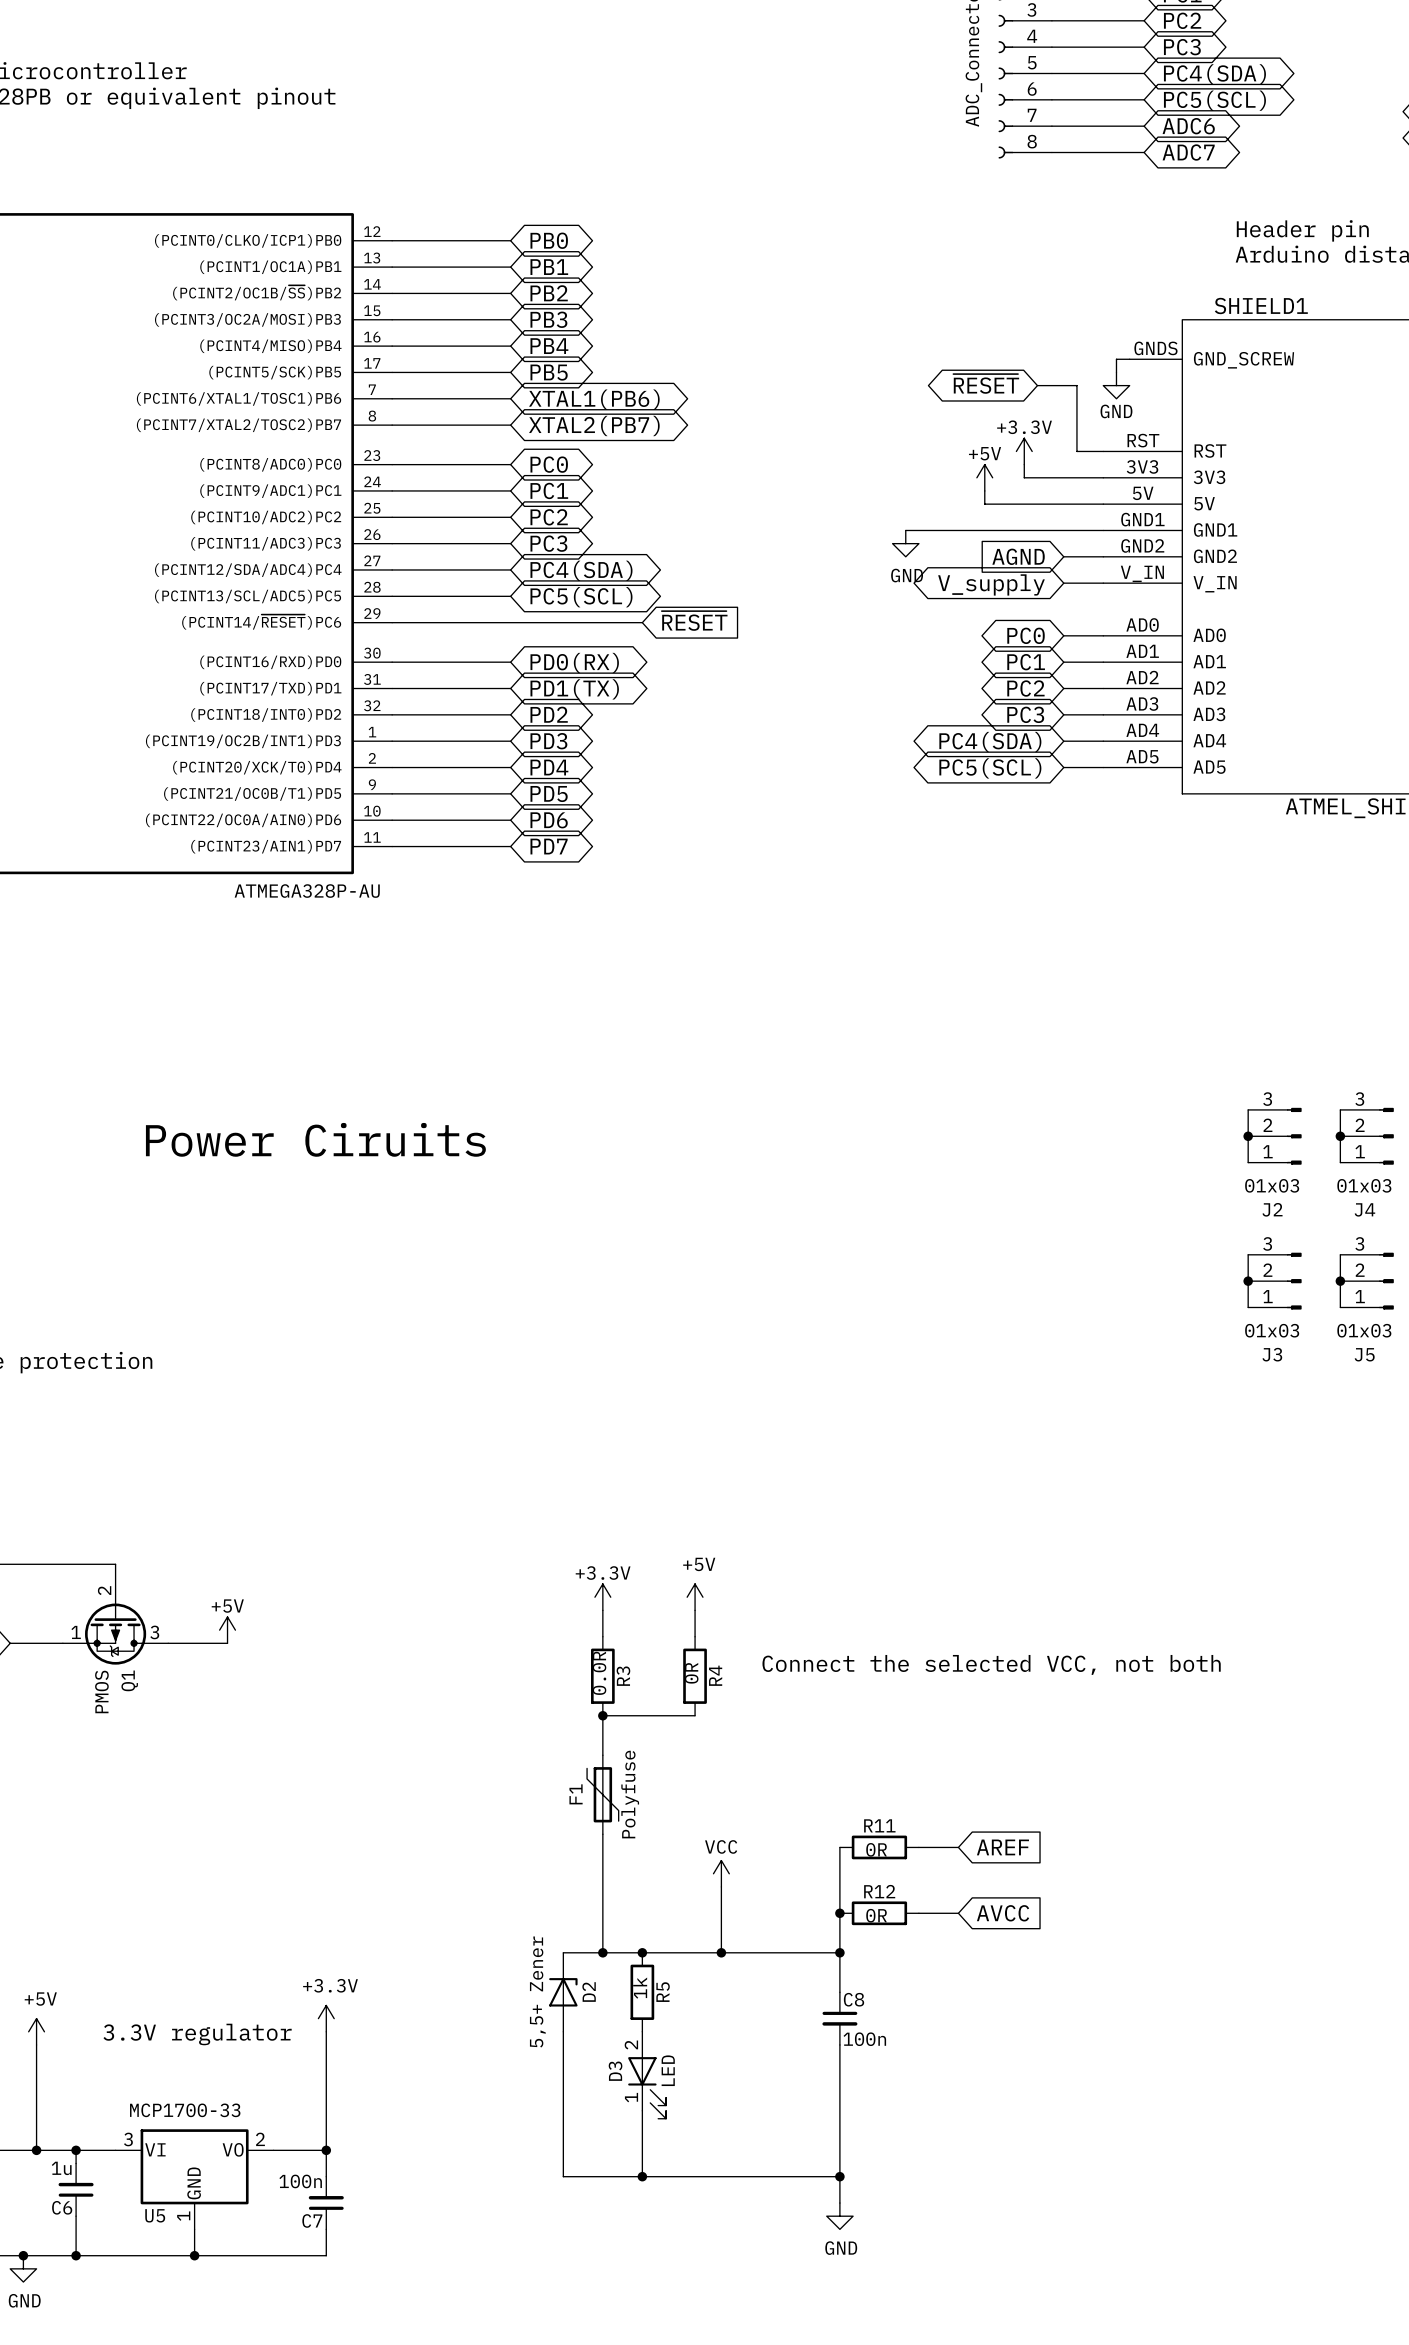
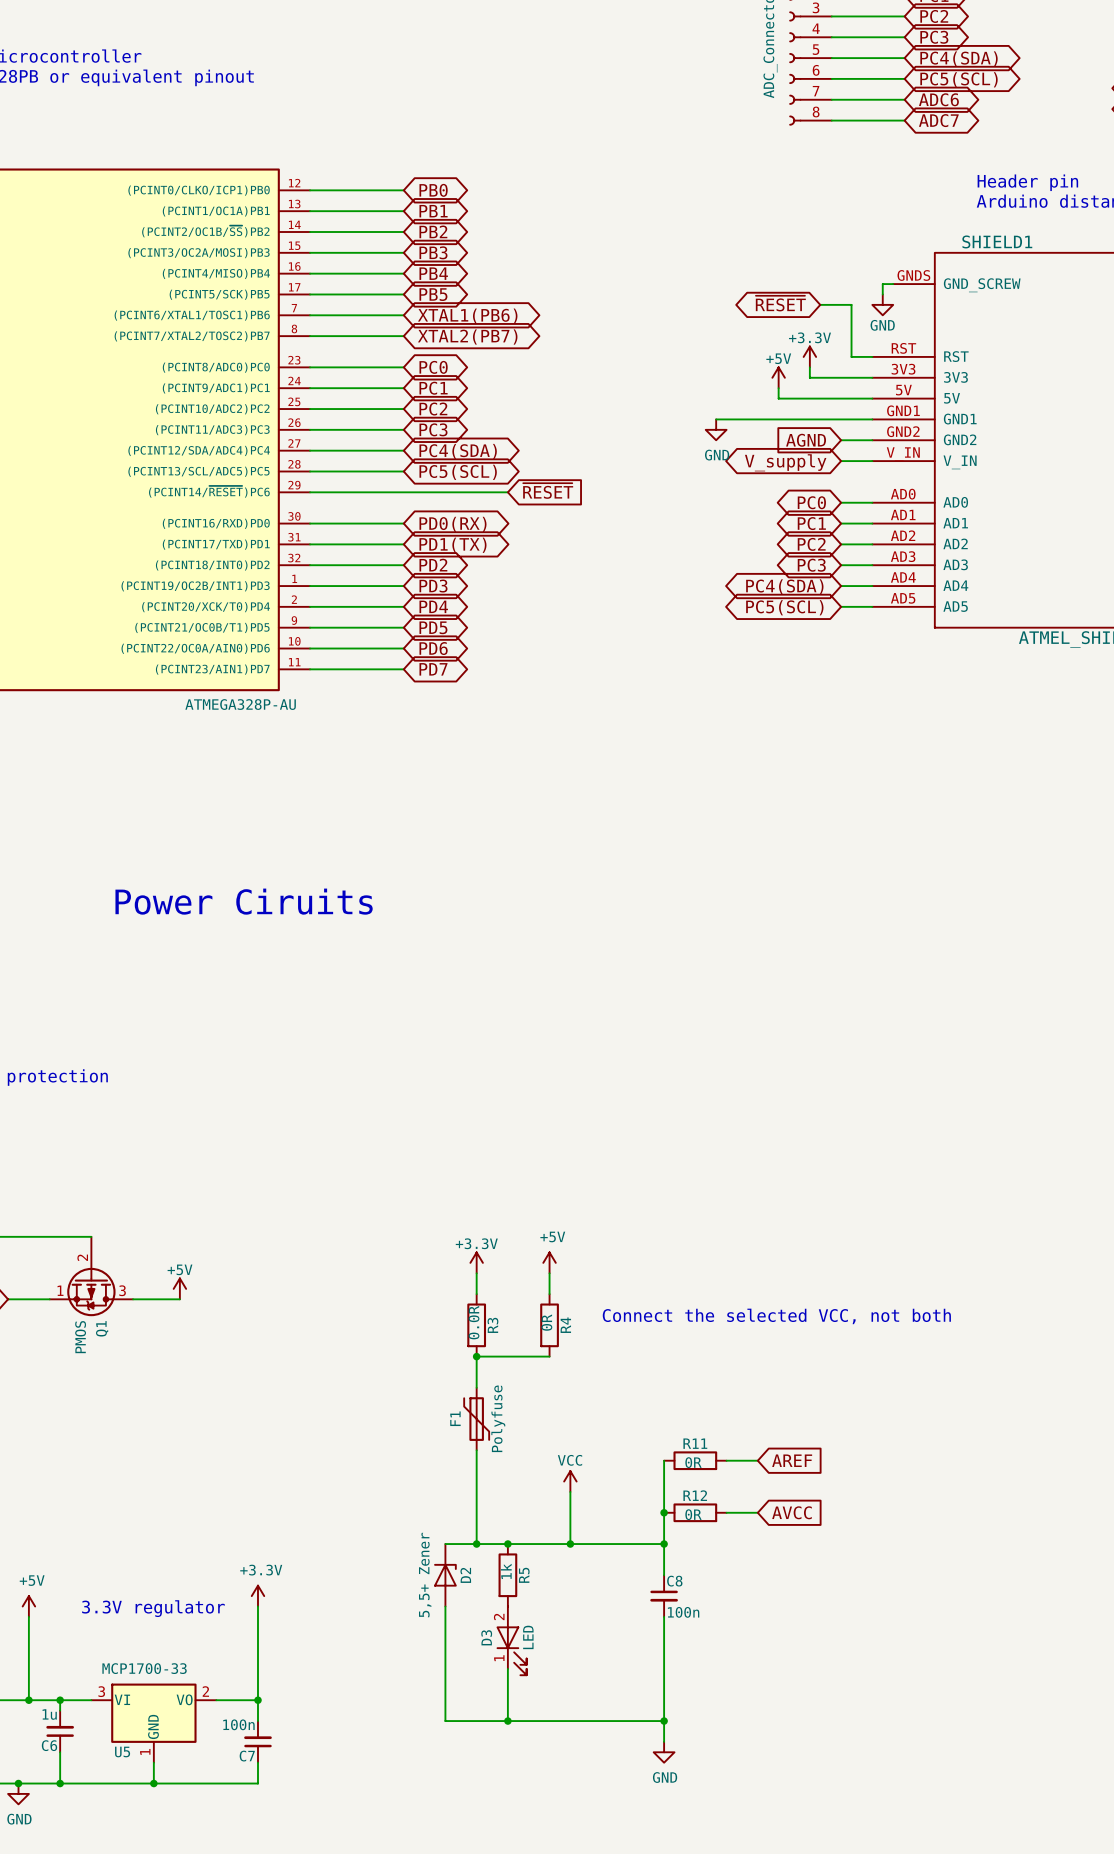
wire: (1248, 1109) (1248, 1162) -> none
wire: (1340, 1109) (1340, 1162) -> none
junction: (1248, 1136) -> none
J2: 01x03 (1274, 1136) -> none
junction: (1340, 1136) -> none
J4: 01x03 (1367, 1136) -> none
wire: (1248, 1254) (1248, 1307) -> none
wire: (1340, 1254) (1340, 1307) -> none
junction: (1248, 1281) -> none
J3: 01x03 (1274, 1281) -> none
junction: (1340, 1281) -> none
J5: 01x03 (1367, 1281) -> none

